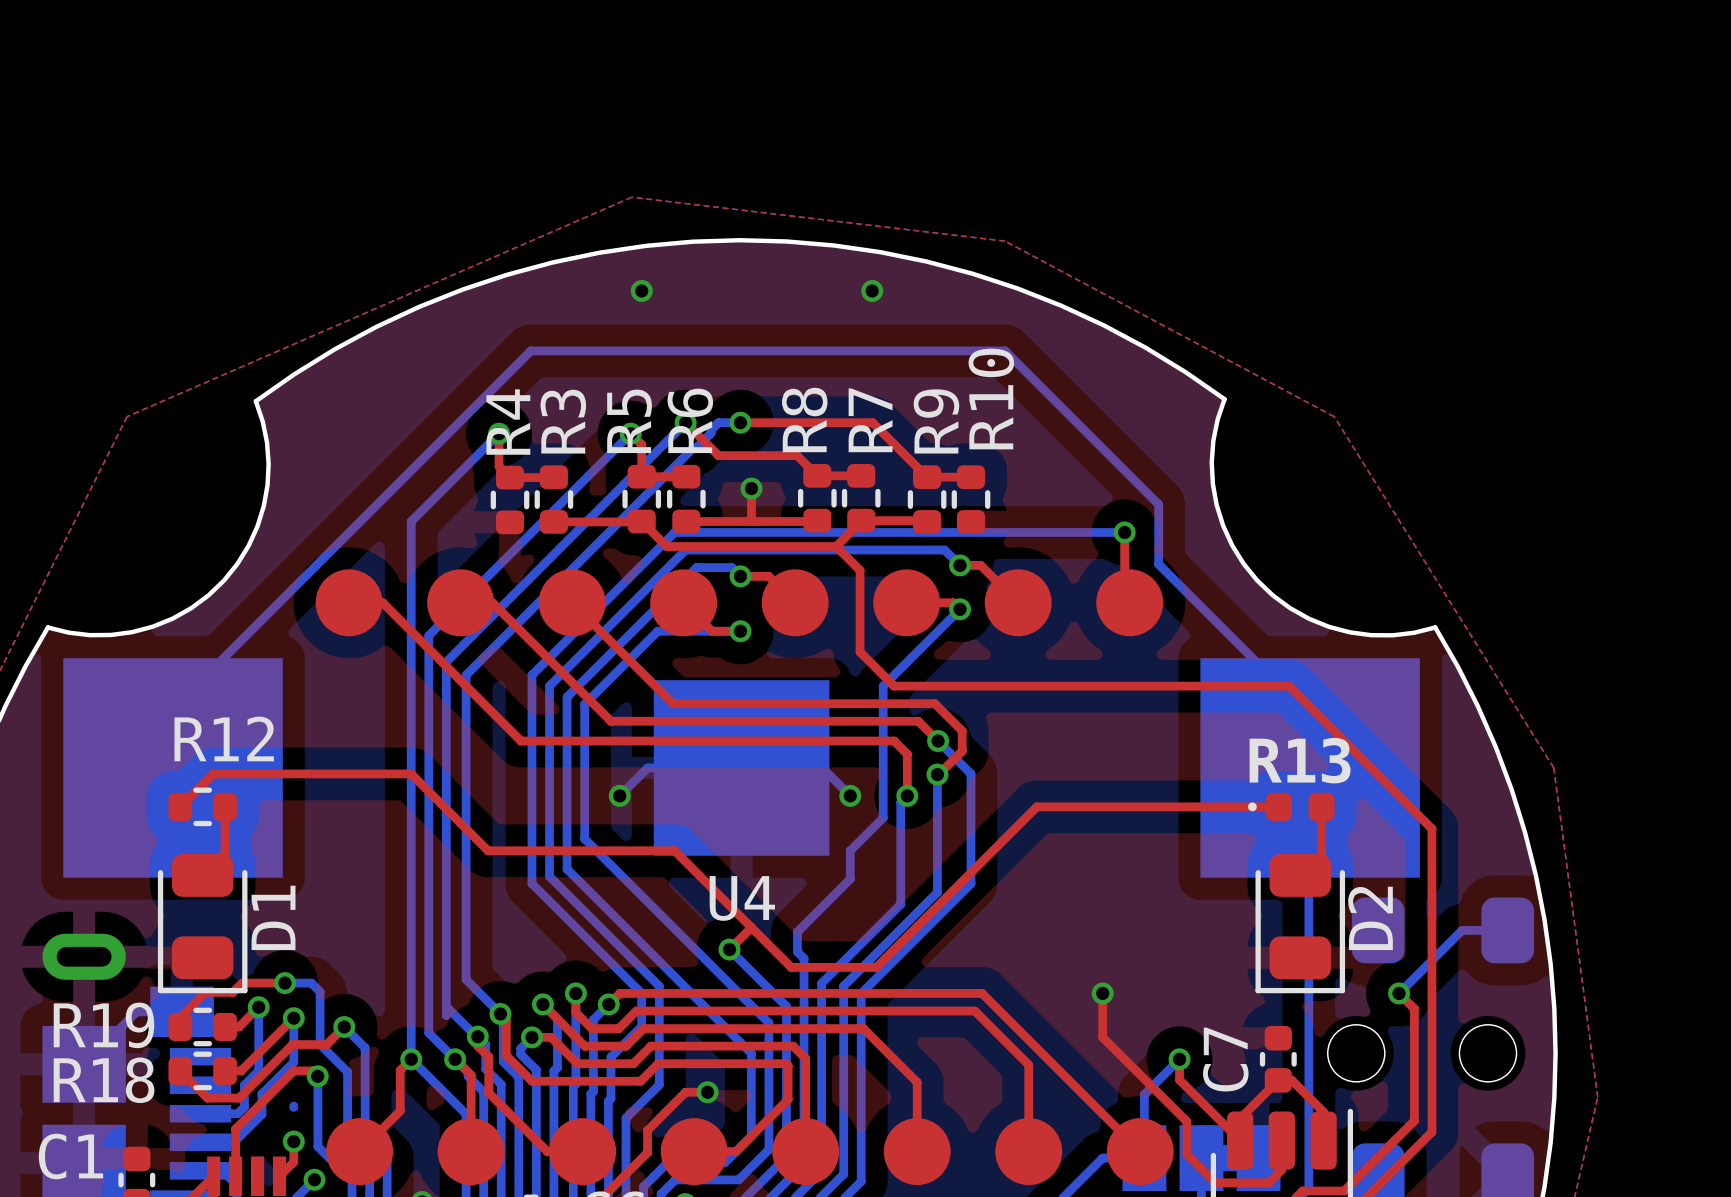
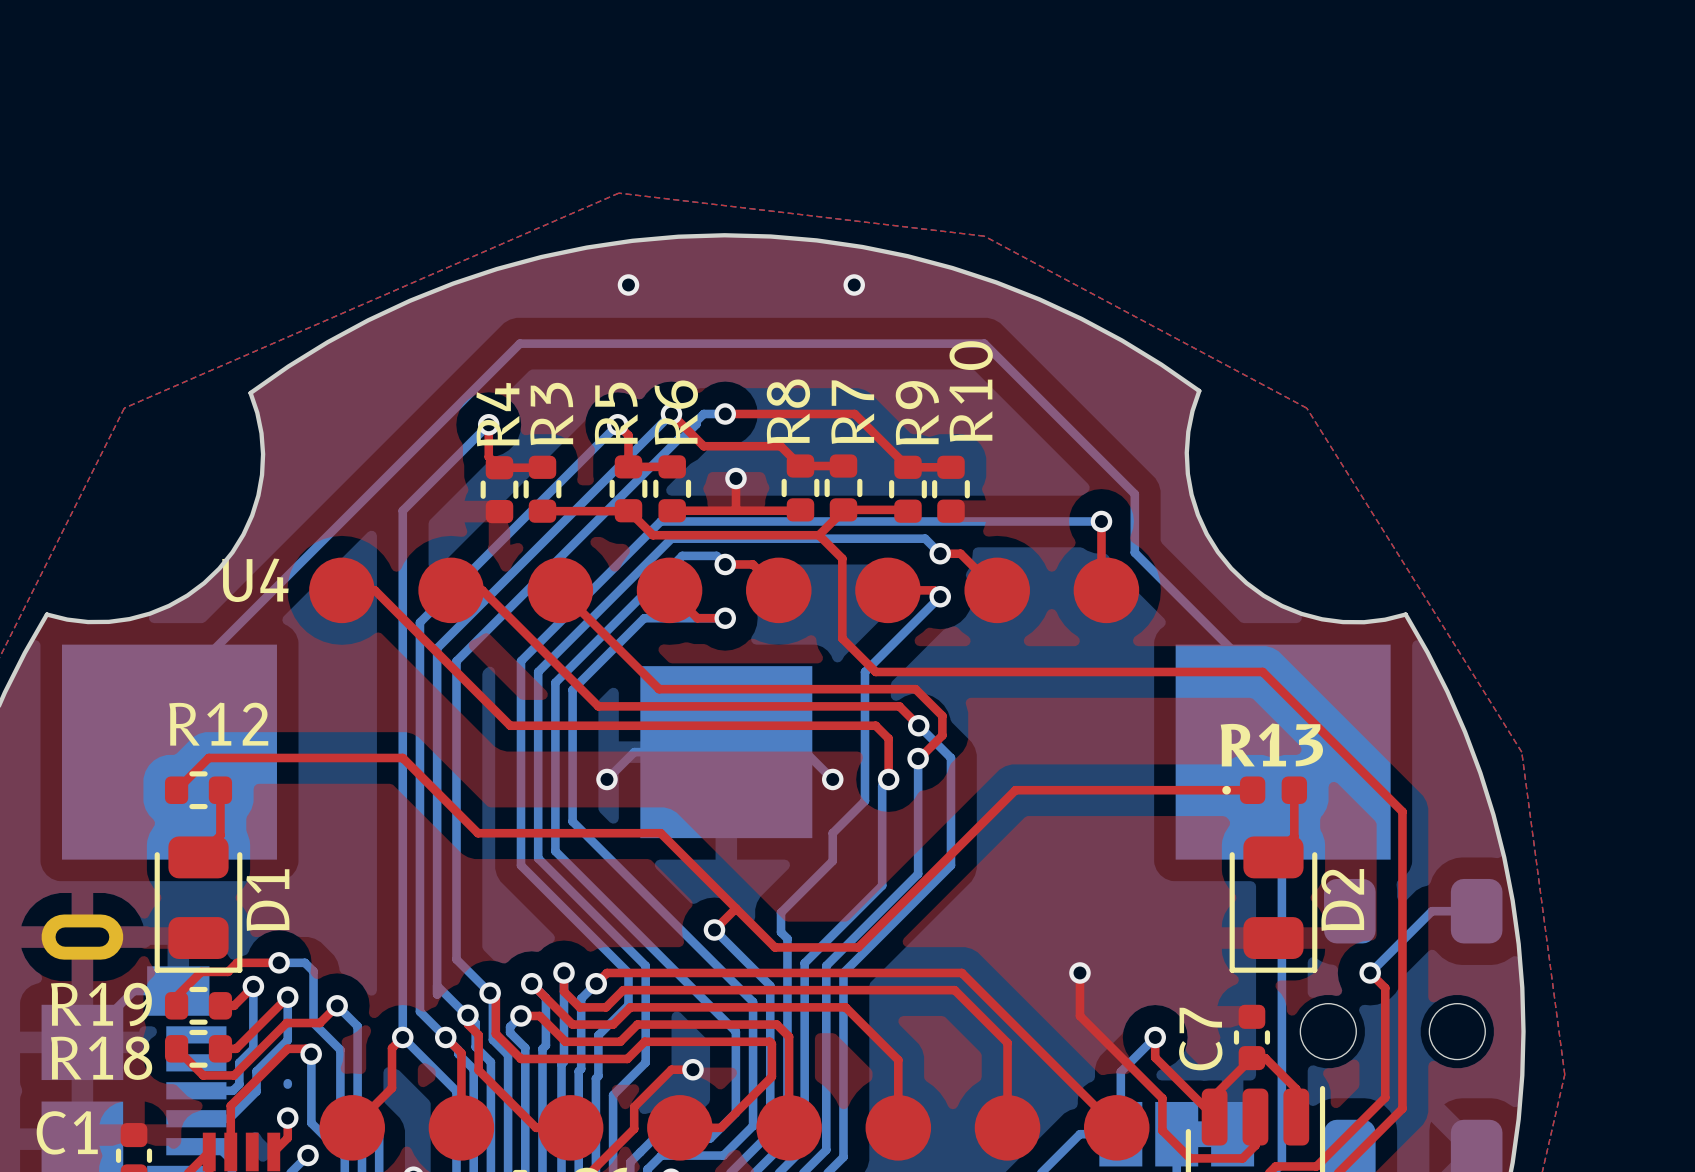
U4 name position: U4 (742, 898) -> U4 (255, 580)

